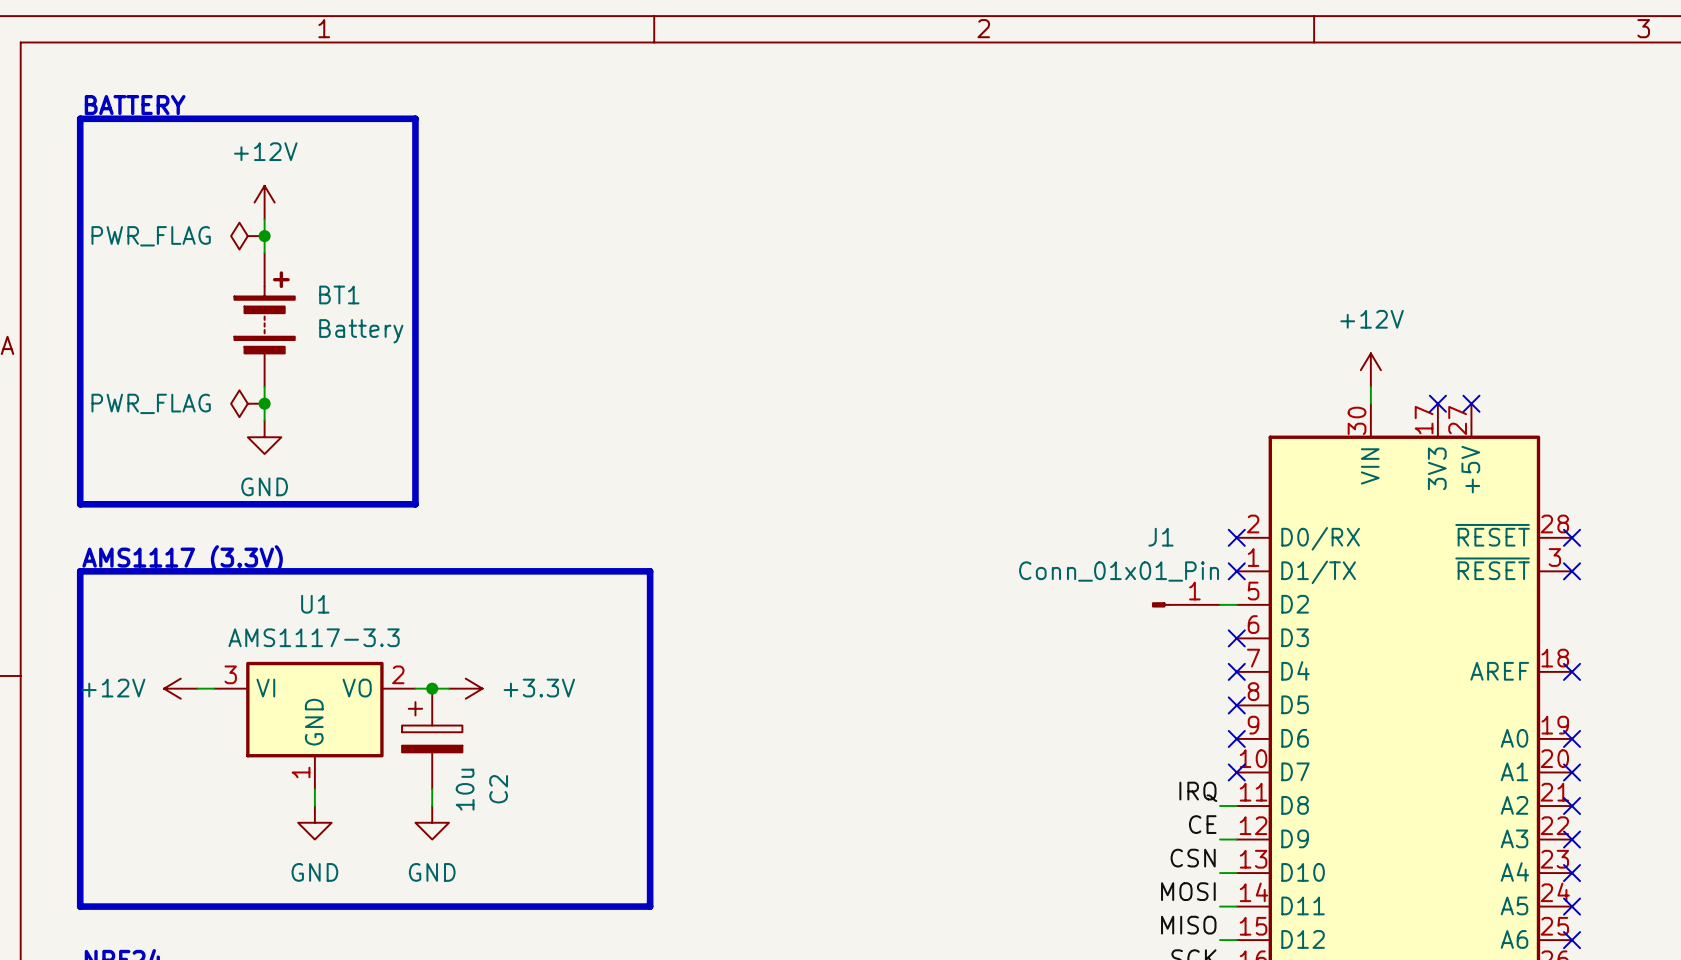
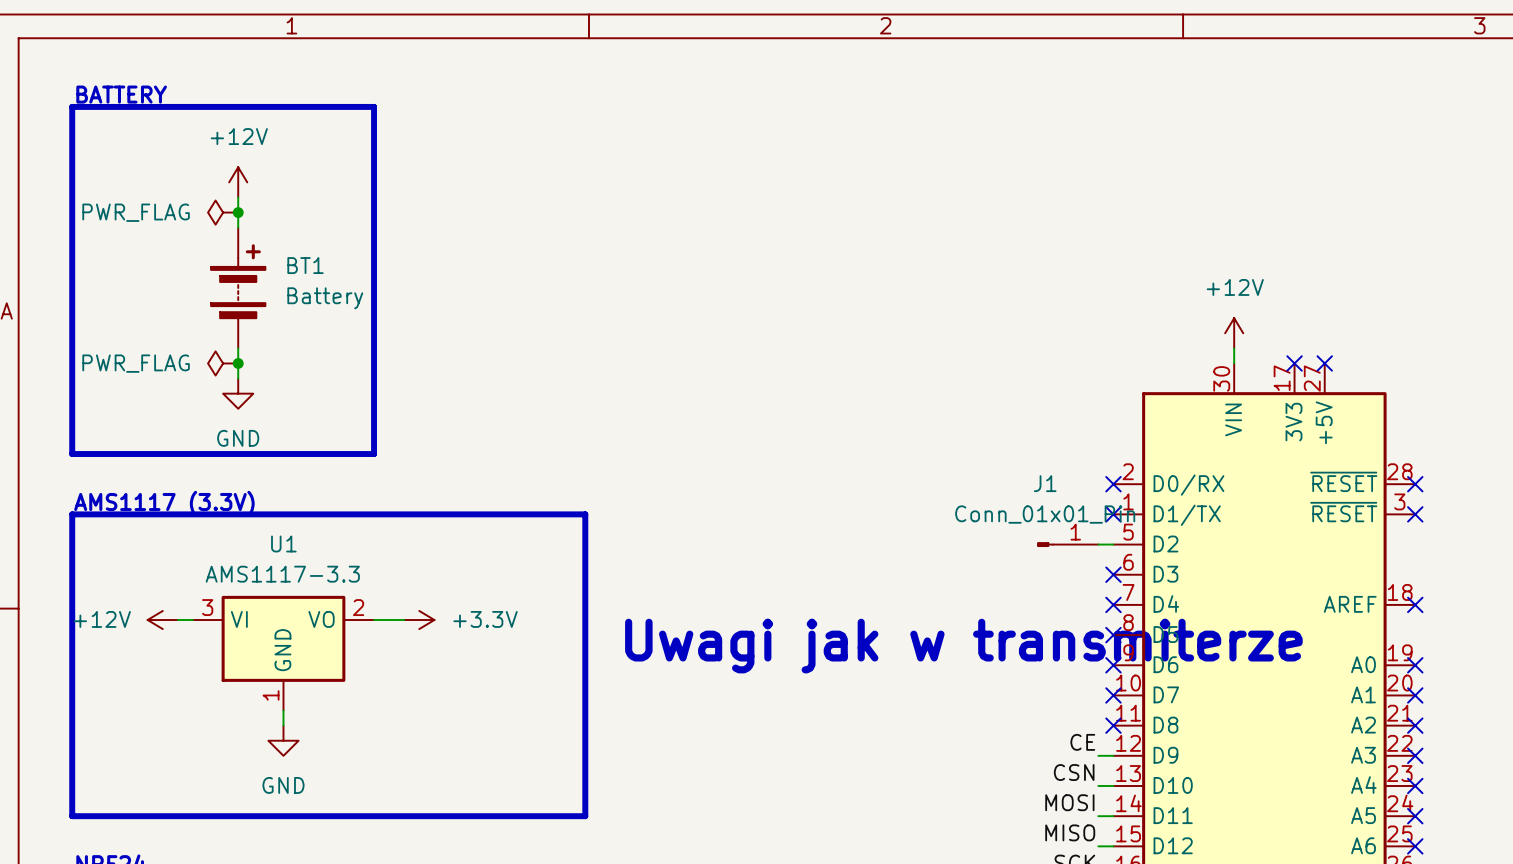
J1 value position: Conn_01x01_Pin (1119, 571) -> Conn_01x01_Pin (1045, 514)
junction: (432, 688) -> none
text: none -> Uwagi jak w transmiterze (963, 646)
C2: 10u (432, 738) -> none
wire: (432, 789) (432, 806) -> none
label: IRQ (1198, 791) -> none
wire: (1220, 806) (1236, 806) -> none
no-connect mark: none -> (1113, 725)
power symbol: GND (432, 822) -> none

